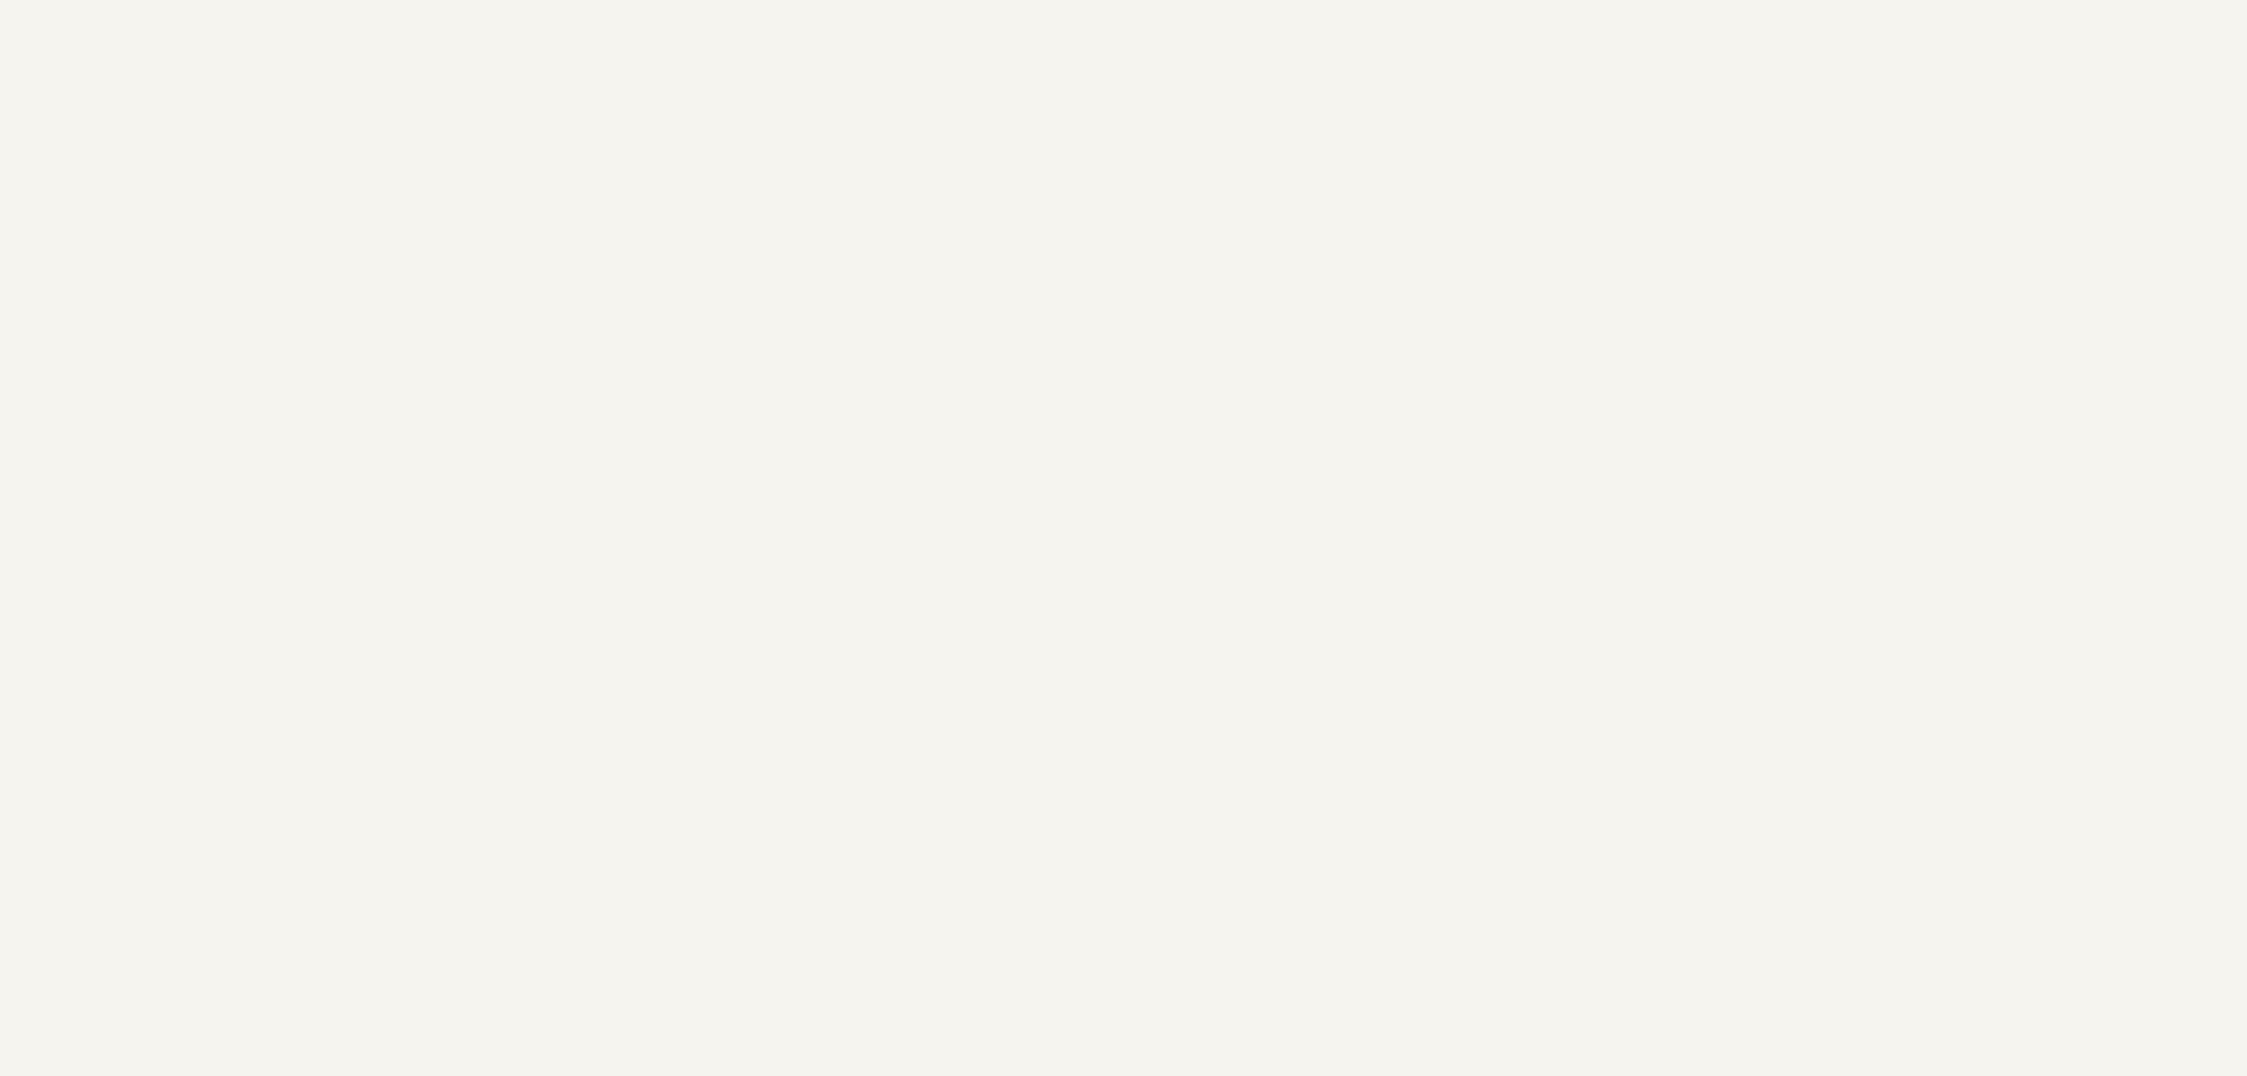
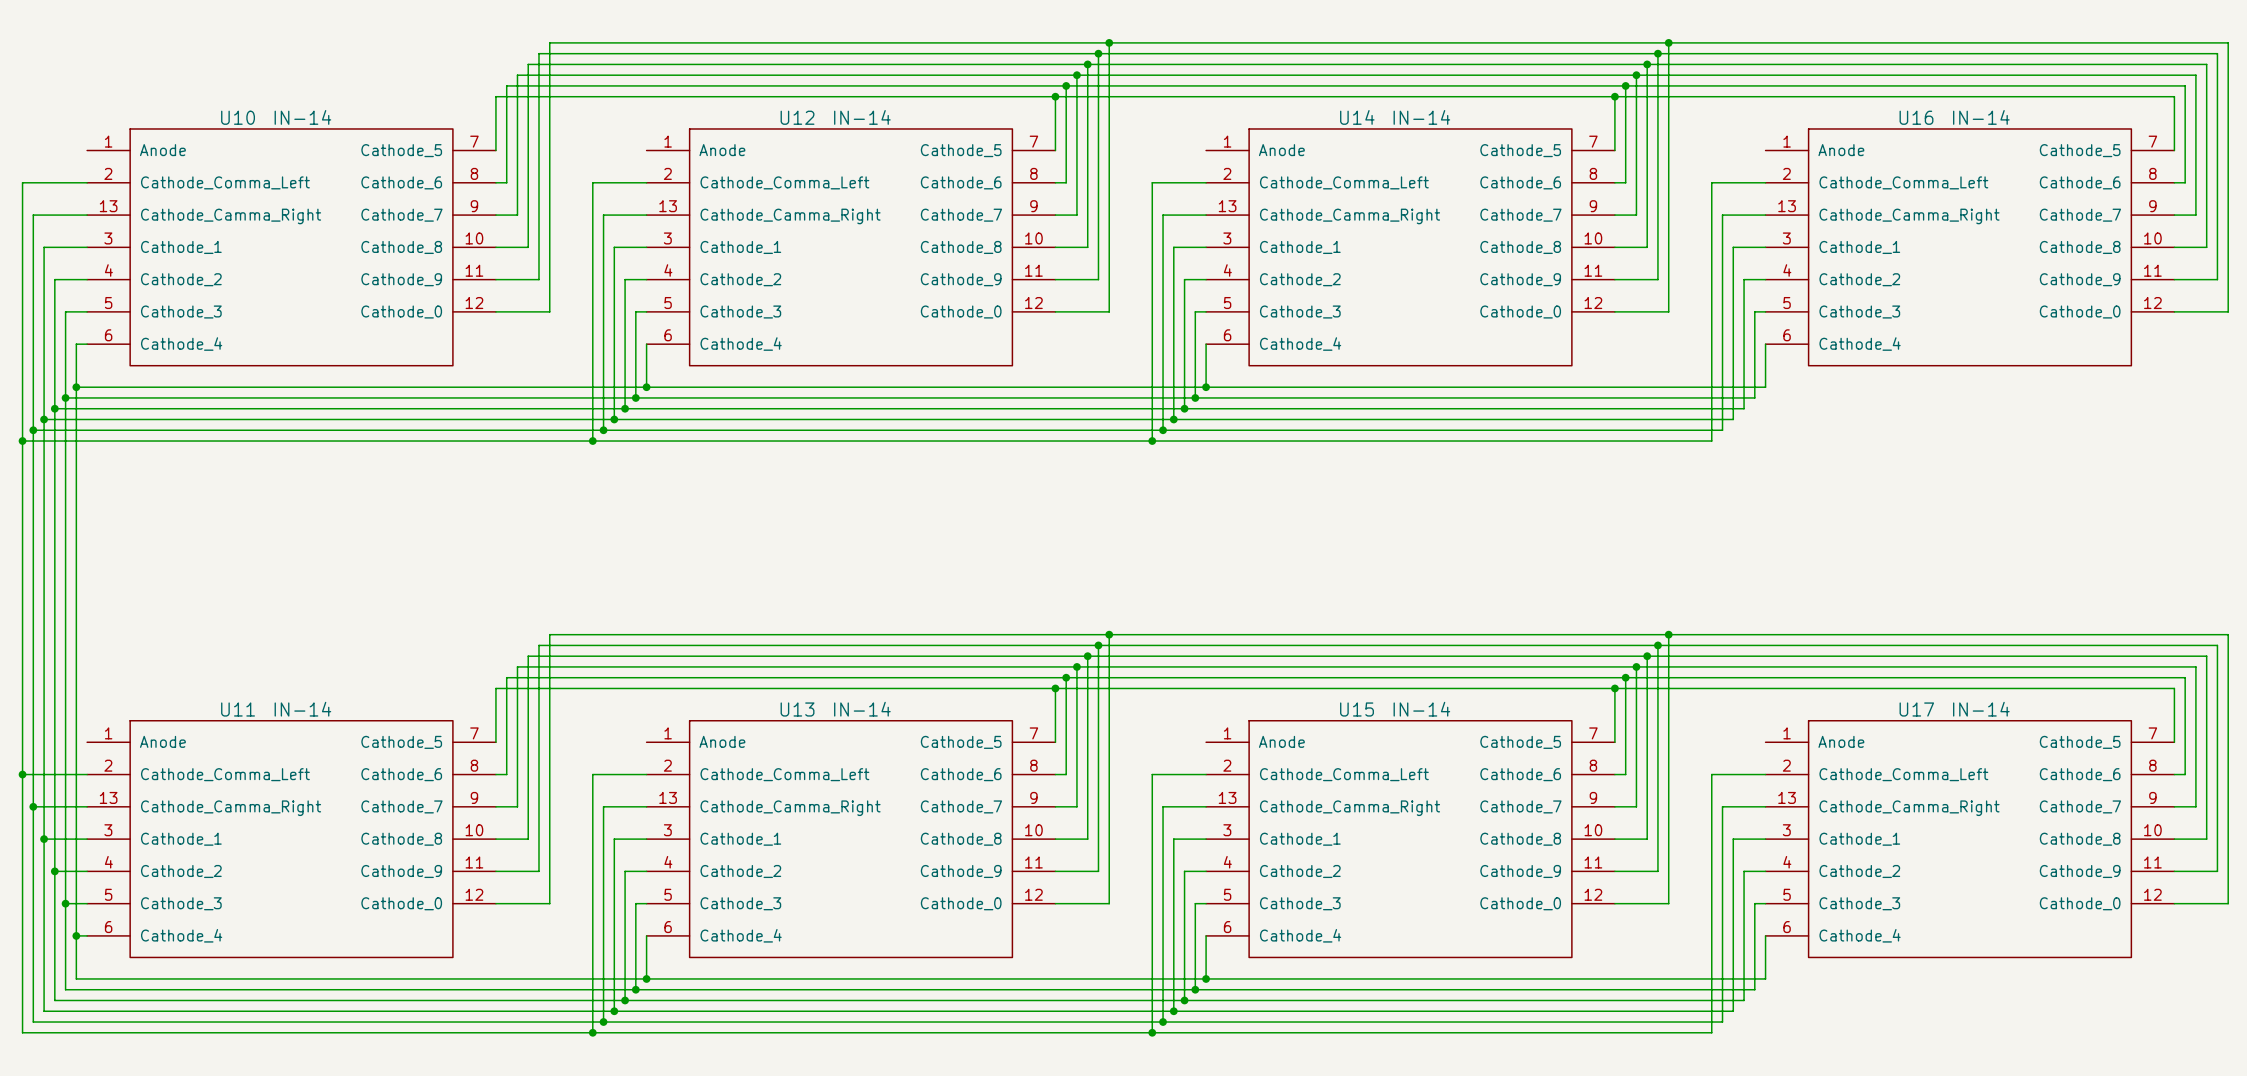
wire: none -> (1109, 42) (1109, 311) (1055, 311)
junction: none -> (1109, 42)
wire: none -> (1668, 42) (1668, 311) (1614, 311)
junction: none -> (1668, 42)
wire: none -> (1098, 53) (1098, 279) (1055, 279)
junction: none -> (1098, 53)
wire: none -> (1657, 53) (1657, 279) (1614, 279)
junction: none -> (1657, 53)
wire: none -> (1087, 64) (1087, 247) (1055, 247)
junction: none -> (1087, 64)
wire: none -> (1647, 64) (1647, 247) (1614, 247)
junction: none -> (1647, 64)
wire: none -> (1076, 75) (1076, 215) (1055, 215)
junction: none -> (1076, 75)
wire: none -> (1636, 75) (1636, 215) (1614, 215)
junction: none -> (1636, 75)
wire: none -> (1066, 85) (1066, 182) (1055, 182)
junction: none -> (1066, 85)
wire: none -> (1625, 85) (1625, 182) (1614, 182)
junction: none -> (1625, 85)
wire: none -> (1055, 96) (1055, 150)
junction: none -> (1055, 96)
wire: none -> (1614, 96) (1614, 150)
junction: none -> (1614, 96)
wire: none -> (495, 150) (495, 96) (2174, 96) (2174, 150)
wire: none -> (87, 182) (22, 182) (22, 1032) (1711, 1032) (1711, 774) (1765, 774)
wire: none -> (495, 182) (506, 182) (506, 85) (2185, 85) (2185, 182) (2174, 182)
wire: none -> (646, 182) (592, 182) (592, 441)
wire: none -> (1206, 182) (1152, 182) (1152, 441)
wire: none -> (1765, 182) (1711, 182) (1711, 441) (22, 441)
wire: none -> (87, 215) (33, 215) (33, 1022) (1722, 1022) (1722, 806) (1765, 806)
wire: none -> (495, 215) (517, 215) (517, 75) (2195, 75) (2195, 215) (2174, 215)
wire: none -> (646, 215) (603, 215) (603, 430)
wire: none -> (1206, 215) (1163, 215) (1163, 430)
wire: none -> (1765, 215) (1722, 215) (1722, 430) (33, 430)
wire: none -> (87, 247) (44, 247) (44, 1011) (1733, 1011) (1733, 839) (1765, 839)
U10: none -> IN-14 (291, 247)
wire: none -> (495, 247) (528, 247) (528, 64) (2206, 64) (2206, 247) (2174, 247)
wire: none -> (646, 247) (614, 247) (614, 419)
U12: none -> IN-14 (851, 247)
wire: none -> (1206, 247) (1173, 247) (1173, 419)
U14: none -> IN-14 (1410, 247)
wire: none -> (1765, 247) (1733, 247) (1733, 419) (44, 419)
U16: none -> IN-14 (1969, 247)
wire: none -> (87, 279) (54, 279) (54, 1000) (1744, 1000) (1744, 871) (1765, 871)
wire: none -> (495, 279) (538, 279) (538, 53) (2217, 53) (2217, 279) (2174, 279)
wire: none -> (646, 279) (625, 279) (625, 408)
wire: none -> (1206, 279) (1184, 279) (1184, 408)
wire: none -> (1765, 279) (1744, 279) (1744, 408) (54, 408)
wire: none -> (87, 311) (65, 311) (65, 989) (1754, 989) (1754, 903) (1765, 903)
wire: none -> (495, 311) (549, 311) (549, 42) (2228, 42) (2228, 311) (2174, 311)
wire: none -> (646, 311) (635, 311) (635, 397)
wire: none -> (1206, 311) (1195, 311) (1195, 397)
wire: none -> (1765, 311) (1754, 311) (1754, 397) (65, 397)
wire: none -> (87, 344) (76, 344) (76, 978) (1765, 978) (1765, 935)
wire: none -> (646, 344) (646, 387)
wire: none -> (1206, 344) (1206, 387)
wire: none -> (1765, 344) (1765, 387) (76, 387)
junction: none -> (76, 387)
junction: none -> (646, 387)
junction: none -> (1206, 387)
junction: none -> (65, 397)
junction: none -> (635, 397)
junction: none -> (1195, 397)
junction: none -> (54, 408)
junction: none -> (625, 408)
junction: none -> (1184, 408)
junction: none -> (44, 419)
junction: none -> (614, 419)
junction: none -> (1173, 419)
junction: none -> (33, 430)
junction: none -> (603, 430)
junction: none -> (1163, 430)
junction: none -> (22, 441)
junction: none -> (592, 441)
junction: none -> (1152, 441)
wire: none -> (1109, 634) (1109, 903) (1055, 903)
junction: none -> (1109, 634)
wire: none -> (1668, 634) (1668, 903) (1614, 903)
junction: none -> (1668, 634)
wire: none -> (1098, 645) (1098, 871) (1055, 871)
junction: none -> (1098, 645)
wire: none -> (1657, 645) (1657, 871) (1614, 871)
junction: none -> (1657, 645)
wire: none -> (1087, 656) (1087, 839) (1055, 839)
junction: none -> (1087, 656)
wire: none -> (1647, 656) (1647, 839) (1614, 839)
junction: none -> (1647, 656)
wire: none -> (1076, 666) (1076, 806) (1055, 806)
junction: none -> (1076, 666)
wire: none -> (1636, 666) (1636, 806) (1614, 806)
junction: none -> (1636, 666)
wire: none -> (1066, 677) (1066, 774) (1055, 774)
junction: none -> (1066, 677)
wire: none -> (1625, 677) (1625, 774) (1614, 774)
junction: none -> (1625, 677)
wire: none -> (1055, 688) (1055, 742)
junction: none -> (1055, 688)
wire: none -> (1614, 688) (1614, 742)
junction: none -> (1614, 688)
wire: none -> (495, 742) (495, 688) (2174, 688) (2174, 742)
wire: none -> (22, 774) (87, 774)
junction: none -> (22, 774)
wire: none -> (495, 774) (506, 774) (506, 677) (2185, 677) (2185, 774) (2174, 774)
wire: none -> (646, 774) (592, 774) (592, 1032)
wire: none -> (1206, 774) (1152, 774) (1152, 1032)
wire: none -> (33, 806) (87, 806)
junction: none -> (33, 806)
wire: none -> (495, 806) (517, 806) (517, 666) (2195, 666) (2195, 806) (2174, 806)
wire: none -> (646, 806) (603, 806) (603, 1022)
wire: none -> (1206, 806) (1163, 806) (1163, 1022)
wire: none -> (44, 839) (87, 839)
junction: none -> (44, 839)
U11: none -> IN-14 (291, 839)
wire: none -> (495, 839) (528, 839) (528, 656) (2206, 656) (2206, 839) (2174, 839)
wire: none -> (646, 839) (614, 839) (614, 1011)
U13: none -> IN-14 (851, 839)
wire: none -> (1206, 839) (1173, 839) (1173, 1011)
U15: none -> IN-14 (1410, 839)
U17: none -> IN-14 (1969, 839)
wire: none -> (54, 871) (87, 871)
junction: none -> (54, 871)
wire: none -> (495, 871) (538, 871) (538, 645) (2217, 645) (2217, 871) (2174, 871)
wire: none -> (646, 871) (625, 871) (625, 1000)
wire: none -> (1206, 871) (1184, 871) (1184, 1000)
wire: none -> (65, 903) (87, 903)
junction: none -> (65, 903)
wire: none -> (495, 903) (549, 903) (549, 634) (2228, 634) (2228, 903) (2174, 903)
wire: none -> (646, 903) (635, 903) (635, 989)
wire: none -> (1206, 903) (1195, 903) (1195, 989)
wire: none -> (76, 935) (87, 935)
junction: none -> (76, 935)
wire: none -> (646, 935) (646, 978)
wire: none -> (1206, 935) (1206, 978)
junction: none -> (646, 978)
junction: none -> (1206, 978)
junction: none -> (635, 989)
junction: none -> (1195, 989)
junction: none -> (625, 1000)
junction: none -> (1184, 1000)
junction: none -> (614, 1011)
junction: none -> (1173, 1011)
junction: none -> (603, 1022)
junction: none -> (1163, 1022)
junction: none -> (592, 1032)
junction: none -> (1152, 1032)

